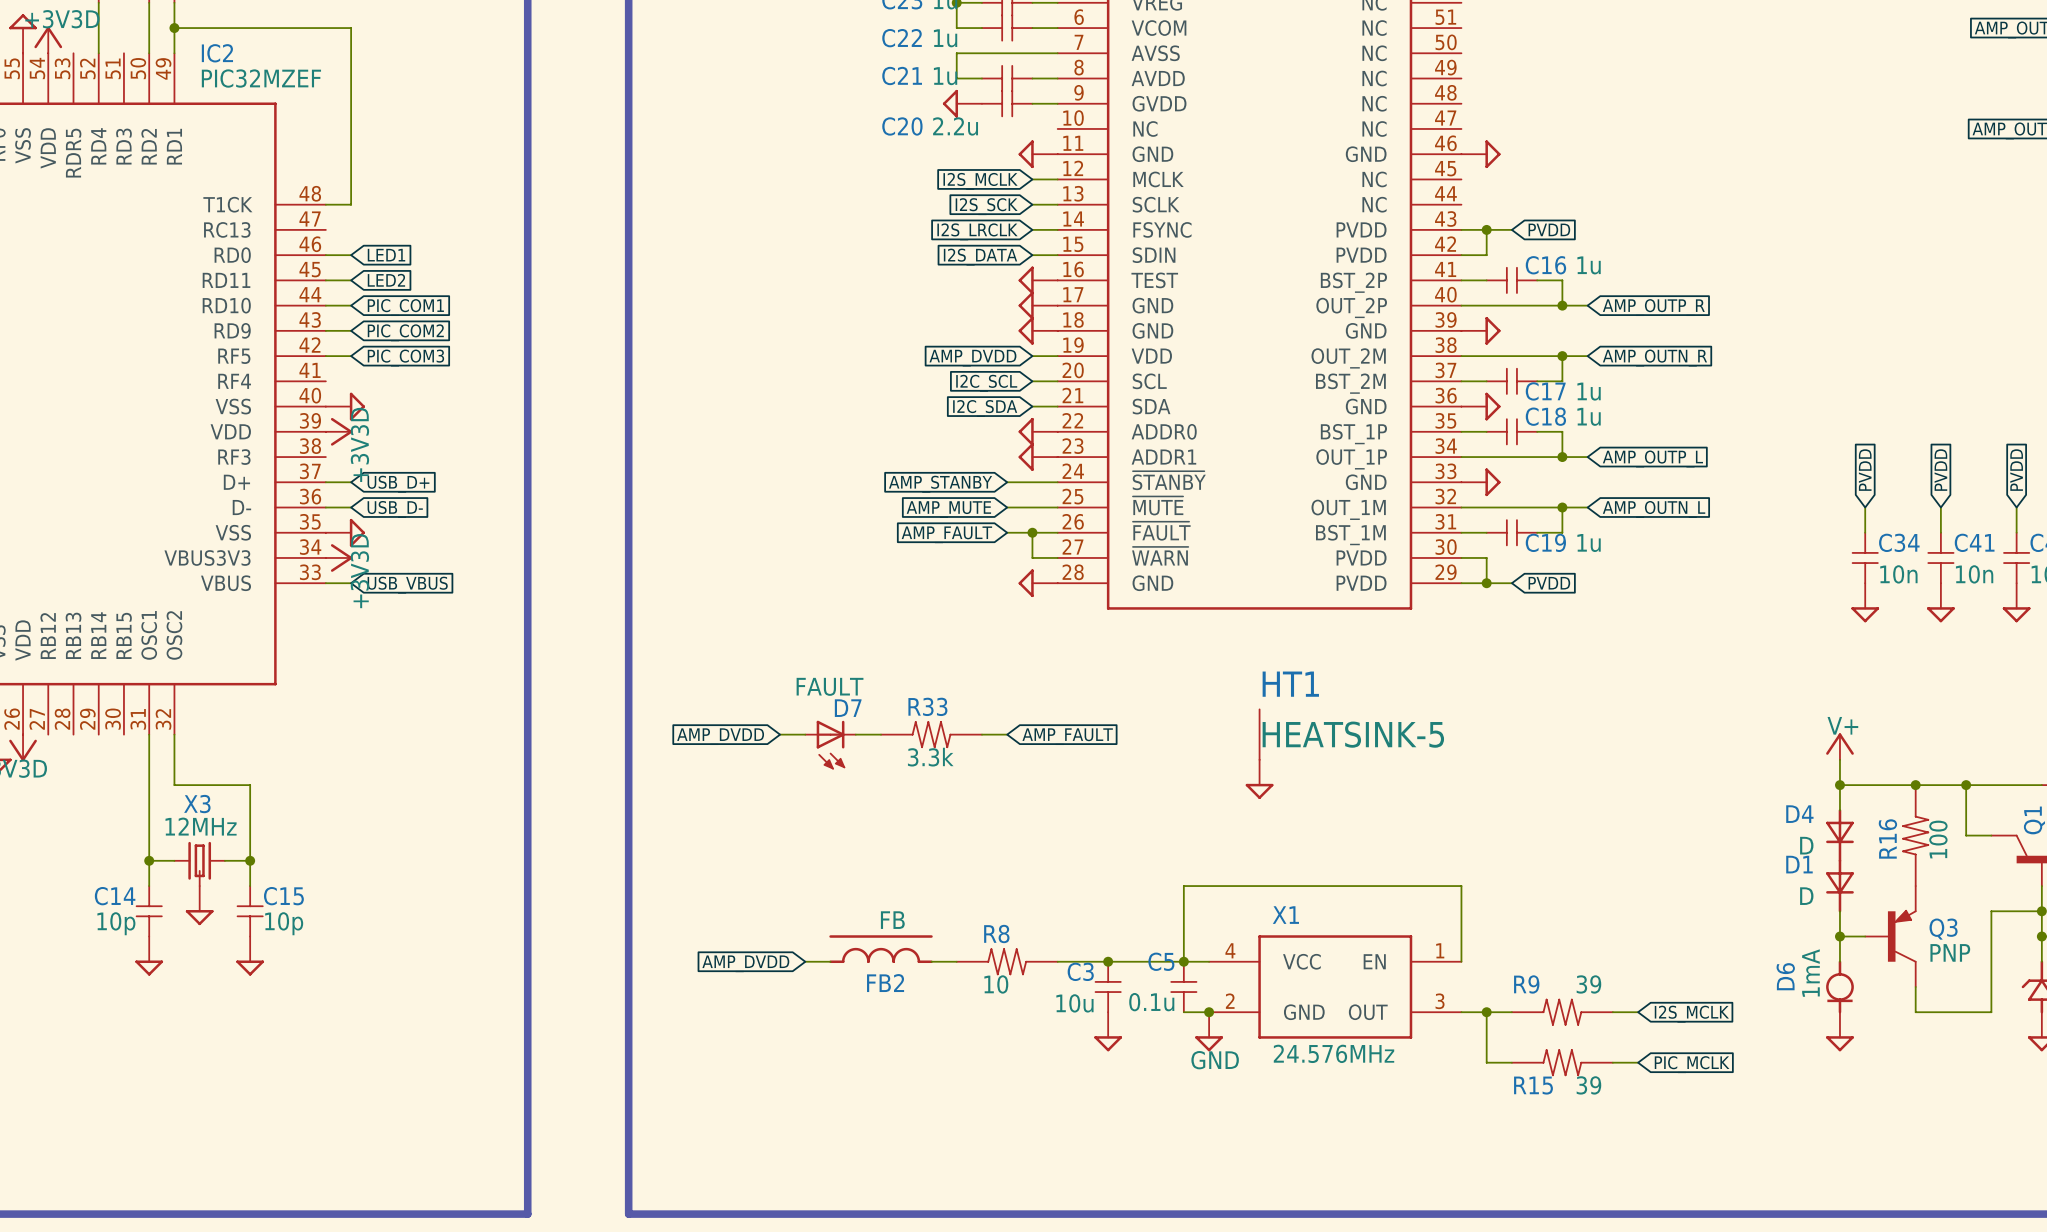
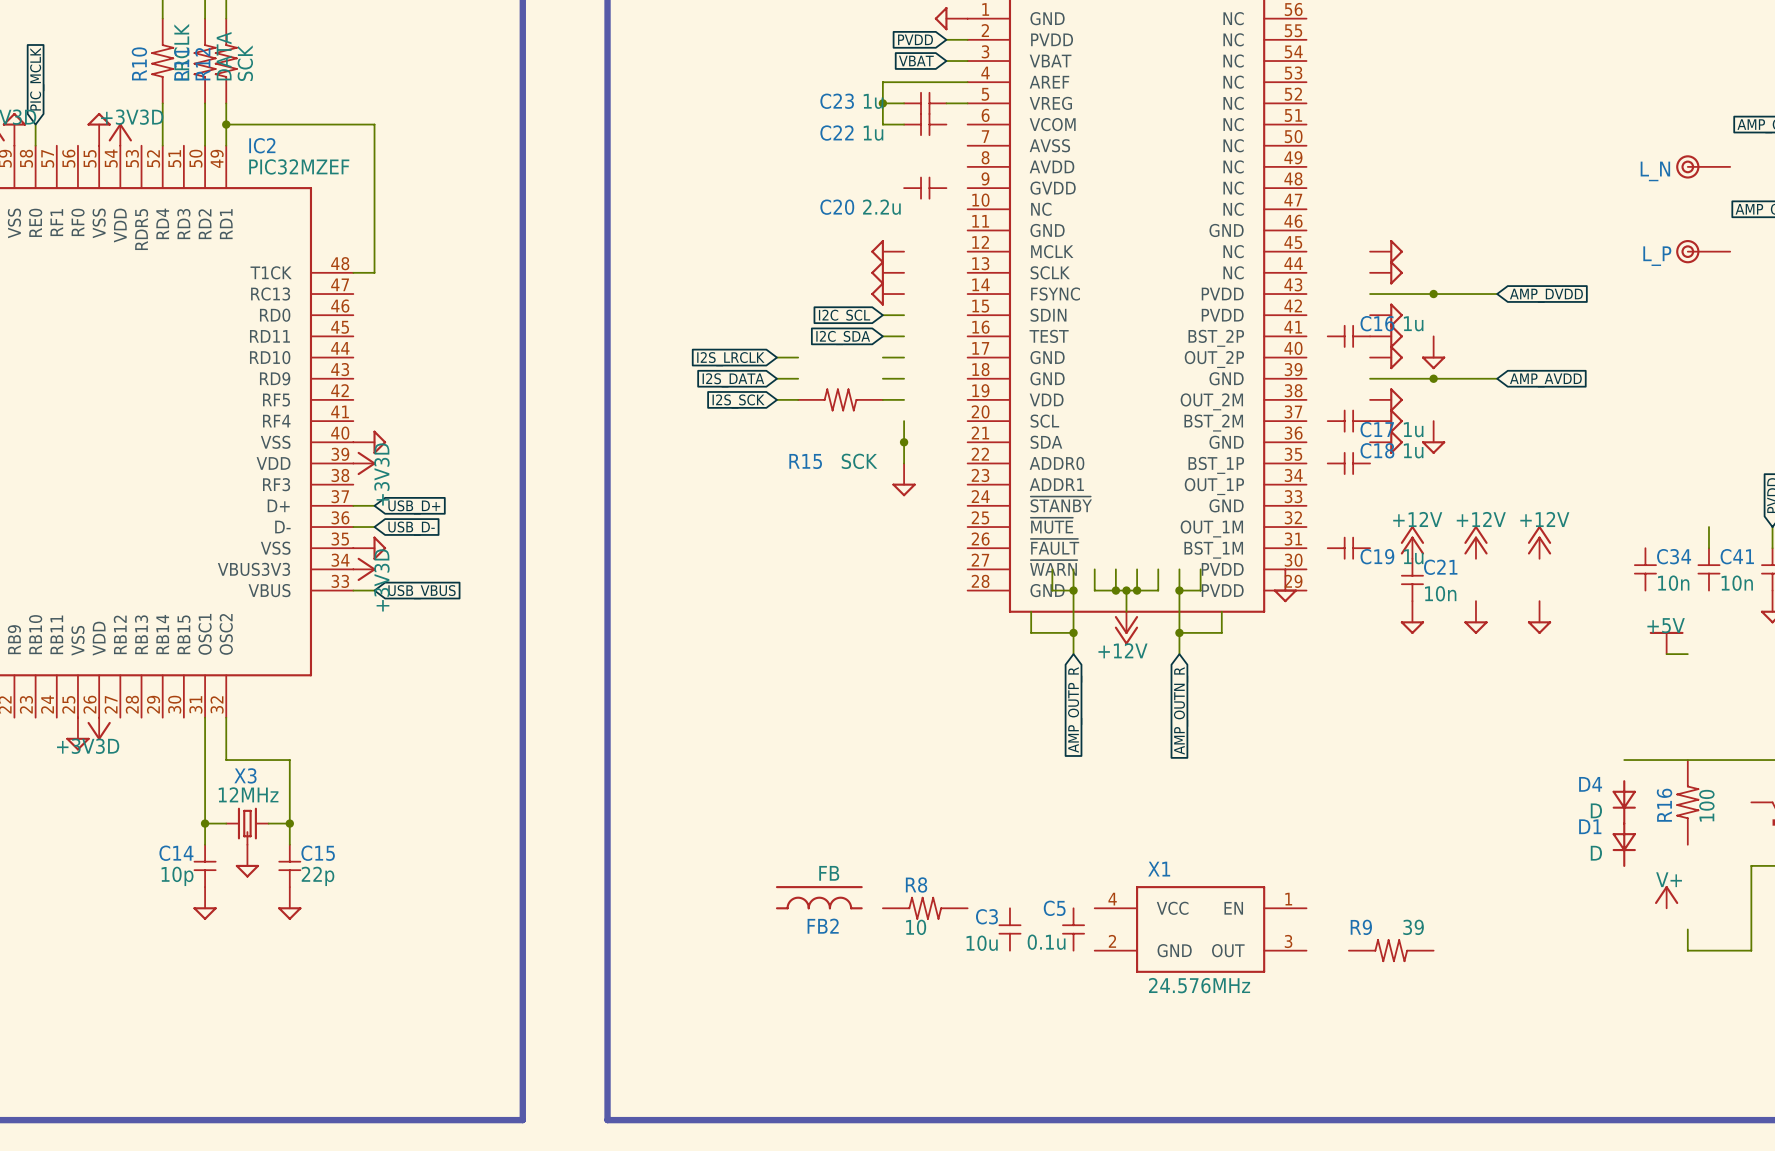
wire: (1032, 28) (1057, 28) -> none
wire: (1057, 53) (956, 53) (956, 78) (981, 78) -> none
C21 name position: C21 (902, 76) -> C21 (1440, 567)
C21 value: 1u (945, 76) -> 10n (1440, 593)
C21 rotation: 0° (1007, 78) -> 90° clockwise (1412, 579)
C21 position: (1007, 78) -> (1412, 579)
wire: (1032, 78) (1057, 78) -> none
part: none -> L_N (1703, 166)
power symbol: (962, 103) -> none
wire: (1032, 103) (1057, 103) -> none
power symbol: (1038, 154) -> none
power symbol: (1481, 154) -> none
power symbol: none -> (887, 251)
wire: (1032, 179) (1057, 179) -> none
power symbol: none -> (1386, 251)
part: none -> L_P (1703, 251)
global label: I2S_MCLK (980, 181) -> none
power symbol: none -> (887, 272)
wire: (1032, 204) (1057, 204) -> (882, 315) (904, 315)
power symbol: none -> (1386, 272)
global label: I2S_SCK (986, 206) -> none
power symbol: none -> (887, 294)
wire: (1032, 229) (1057, 229) -> (882, 336) (904, 336)
wire: (1461, 229) (1511, 229) -> none
wire: (1486, 229) (1486, 255) (1461, 255) -> none
junction: (1486, 229) -> none
wire: none -> (1370, 294) (1497, 294)
global label: PVDD (1549, 229) -> none
junction: none -> (1433, 294)
global label position: I2S_LRCLK (977, 231) -> I2S_LRCLK (730, 359)
global label: none -> AMP_DVDD (1546, 295)
wire: (325, 255) (351, 255) -> none
global label: LED1 (386, 255) -> none
wire: (1032, 255) (1057, 255) -> (882, 357) (904, 357)
power symbol: none -> (1386, 315)
global label position: I2S_DATA (980, 257) -> I2S_DATA (733, 380)
wire: (325, 280) (351, 280) -> none
global label: LED2 (386, 280) -> none
power symbol: (1038, 280) -> none
wire: (1461, 280) (1486, 280) -> none
power symbol: none -> (1386, 336)
power symbol: none -> (1433, 352)
wire: (325, 305) (351, 305) -> none
power symbol: (1038, 305) -> none
wire: (1461, 305) (1587, 305) -> none
power symbol: none -> (1386, 357)
junction: (1562, 305) -> none
global label: PIC_COM1 (405, 307) -> none
global label: AMP_OUTP_R (1653, 307) -> none
wire: (325, 330) (351, 330) -> none
wire: none -> (776, 378) (798, 378)
power symbol: (1038, 330) -> none
power symbol: (1481, 330) -> none
wire: none -> (1370, 378) (1497, 378)
junction: none -> (1433, 378)
global label: PIC_COM2 (405, 332) -> none
global label: none -> AMP_AVDD (1545, 380)
wire: (325, 356) (351, 356) -> none
wire: none -> (776, 399) (798, 399)
wire: (1032, 356) (1057, 356) -> (776, 357) (798, 357)
wire: (1461, 356) (1587, 356) -> none
power symbol: none -> (1386, 399)
junction: (1562, 356) -> none
global label: PIC_COM3 (405, 358) -> none
global label: none -> I2S_SCK (738, 401)
global label: AMP_DVDD (972, 358) -> none
global label: AMP_OUTN_R (1654, 358) -> none
wire: none -> (904, 421) (904, 463)
wire: (1032, 381) (1057, 381) -> (882, 378) (904, 378)
wire: (1461, 381) (1486, 381) -> none
power symbol: none -> (1386, 421)
global label position: I2C_SCL (986, 383) -> I2C_SCL (844, 316)
power symbol: none -> (1433, 437)
junction: none -> (904, 442)
wire: (1032, 406) (1057, 406) -> (882, 399) (904, 399)
power symbol: (1481, 406) -> none
power symbol: none -> (1386, 442)
global label position: I2C_SDA (985, 408) -> I2C_SDA (843, 337)
power symbol: (1038, 431) -> none
wire: (1461, 431) (1486, 431) -> none
wire: (1537, 431) (1562, 431) (1562, 457) -> none
power symbol: none -> (904, 479)
power symbol: (1038, 457) -> none
wire: (1461, 457) (1587, 457) -> none
junction: (1562, 457) -> none
global label: AMP_OUTP_L (1652, 458) -> none
global label: PVDD (1865, 470) -> none
global label: PVDD (1940, 470) -> none
wire: (1007, 482) (1057, 482) -> none
power symbol: (1481, 482) -> none
global label: AMP_STANBY (940, 484) -> none
wire: (1007, 507) (1057, 507) -> none
wire: (1461, 507) (1587, 507) -> none
wire: (1562, 507) (1562, 532) (1537, 532) -> (1200, 569) (1200, 590) (1179, 590)
junction: (1562, 507) -> none
wire: (1865, 507) (1865, 532) -> none
global label: AMP_MUTE (948, 509) -> none
global label: AMP_OUTN_L (1654, 509) -> none
power symbol: none -> +12V (1412, 542)
power symbol: none -> +12V (1475, 542)
power symbol: none -> +12V (1539, 542)
wire: (1007, 532) (1057, 532) -> none
wire: (1032, 532) (1032, 557) (1057, 557) -> (1052, 569) (1052, 590) (1073, 590)
junction: (1032, 532) -> none
wire: (1461, 532) (1486, 532) -> none
global label: AMP_FAULT (946, 534) -> none
wire: none -> (1073, 569) (1073, 654)
wire: none -> (1094, 569) (1094, 590) (1158, 590) (1158, 569)
wire: none -> (1115, 569) (1115, 590)
wire: none -> (1137, 569) (1137, 590)
wire: none -> (1179, 569) (1179, 654)
wire: (1461, 557) (1486, 557) (1486, 583) -> none
power symbol: none -> (1285, 585)
power symbol: (1038, 583) -> none
junction: none -> (1073, 590)
junction: none -> (1115, 590)
wire: none -> (1126, 590) (1126, 611)
junction: none -> (1126, 590)
junction: none -> (1137, 590)
junction: none -> (1179, 590)
wire: (1461, 583) (1511, 583) -> none
junction: (1486, 583) -> none
global label: PVDD (1549, 583) -> none
power symbol: (1865, 602) -> none
power symbol: (1940, 602) -> none
wire: none -> (1031, 611) (1031, 632) (1073, 632)
wire: none -> (1221, 611) (1221, 632) (1179, 632)
power symbol: none -> (1412, 617)
power symbol: none -> (1475, 617)
power symbol: none -> (1539, 617)
power symbol: none -> +12V (1126, 628)
junction: none -> (1073, 632)
junction: none -> (1179, 632)
power symbol: none -> +5V (1666, 642)
wire: none -> (1666, 654) (1687, 654)
global label: none -> AMP_OUTP_R (1075, 709)
global label: none -> AMP_OUTN_R (1181, 710)
wire: (780, 734) (805, 734) -> none
wire: (855, 734) (881, 734) -> none
R33: 3.3k (931, 734) -> none
wire: (981, 734) (1007, 734) -> none
HT1: HEATSINK-5 (1259, 734) -> none
global label: AMP_DVDD (720, 736) -> none
global label: AMP_FAULT (1067, 736) -> none
D7: FAULT (830, 745) -> none
power symbol position: V+ (1839, 746) -> V+ (1666, 897)
wire: (1839, 759) (1839, 810) -> none
power symbol: (1259, 779) -> none
junction: (1839, 785) -> none
junction: (1915, 785) -> none
wire: (1966, 785) (1966, 835) (1991, 835) -> none
junction: (1966, 785) -> none
wire: (1839, 911) (1839, 961) -> none
C15 value: 10p (284, 923) -> 22p (318, 876)
wire: (1839, 936) (1865, 936) -> none
junction: (1839, 936) -> none
Q3: PNP (1890, 936) -> none
wire: (805, 961) (830, 961) -> none
wire: (931, 961) (956, 961) -> none
wire: (1057, 961) (1209, 961) -> none
junction: (1108, 961) -> none
wire: (1183, 961) (1183, 886) (1461, 886) (1461, 961) -> none
junction: (1183, 961) -> none
global label: AMP_DVDD (745, 963) -> none
D6: 1mA (1839, 986) -> none
wire: (1183, 1012) (1209, 1012) -> none
junction: (1209, 1012) -> none
wire: (1461, 1012) (1511, 1012) -> none
wire: (1486, 1012) (1486, 1062) (1511, 1062) -> none
junction: (1486, 1012) -> none
wire: (1612, 1012) (1638, 1012) -> none
global label: I2S_MCLK (1691, 1014) -> none
power symbol: (1108, 1031) -> none
power symbol: GND (1209, 1031) -> none
power symbol: (1839, 1031) -> none
R15 position: (1562, 1062) -> (840, 399)
wire: (1612, 1062) (1638, 1062) -> none
global label: PIC_MCLK (1692, 1064) -> none
R15 name position: R15 (1533, 1085) -> R15 (805, 461)
R15 value: 39 (1588, 1085) -> SCK (859, 461)

